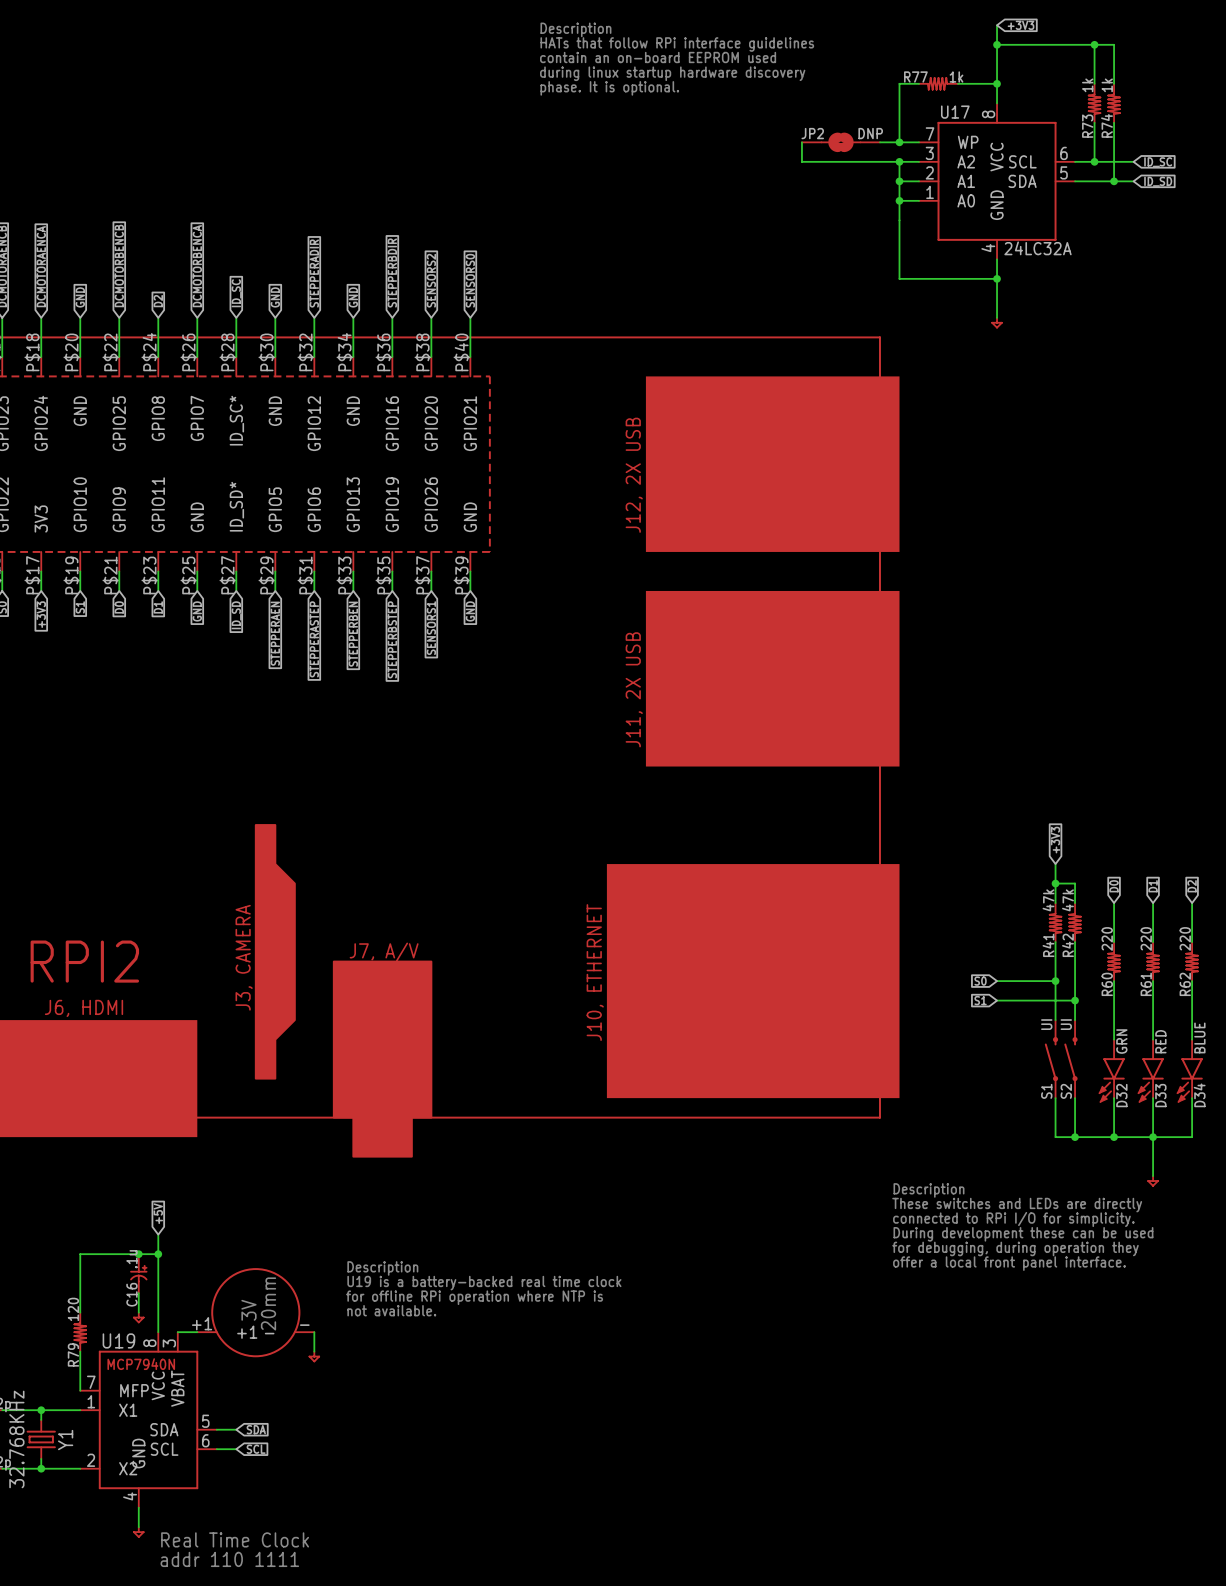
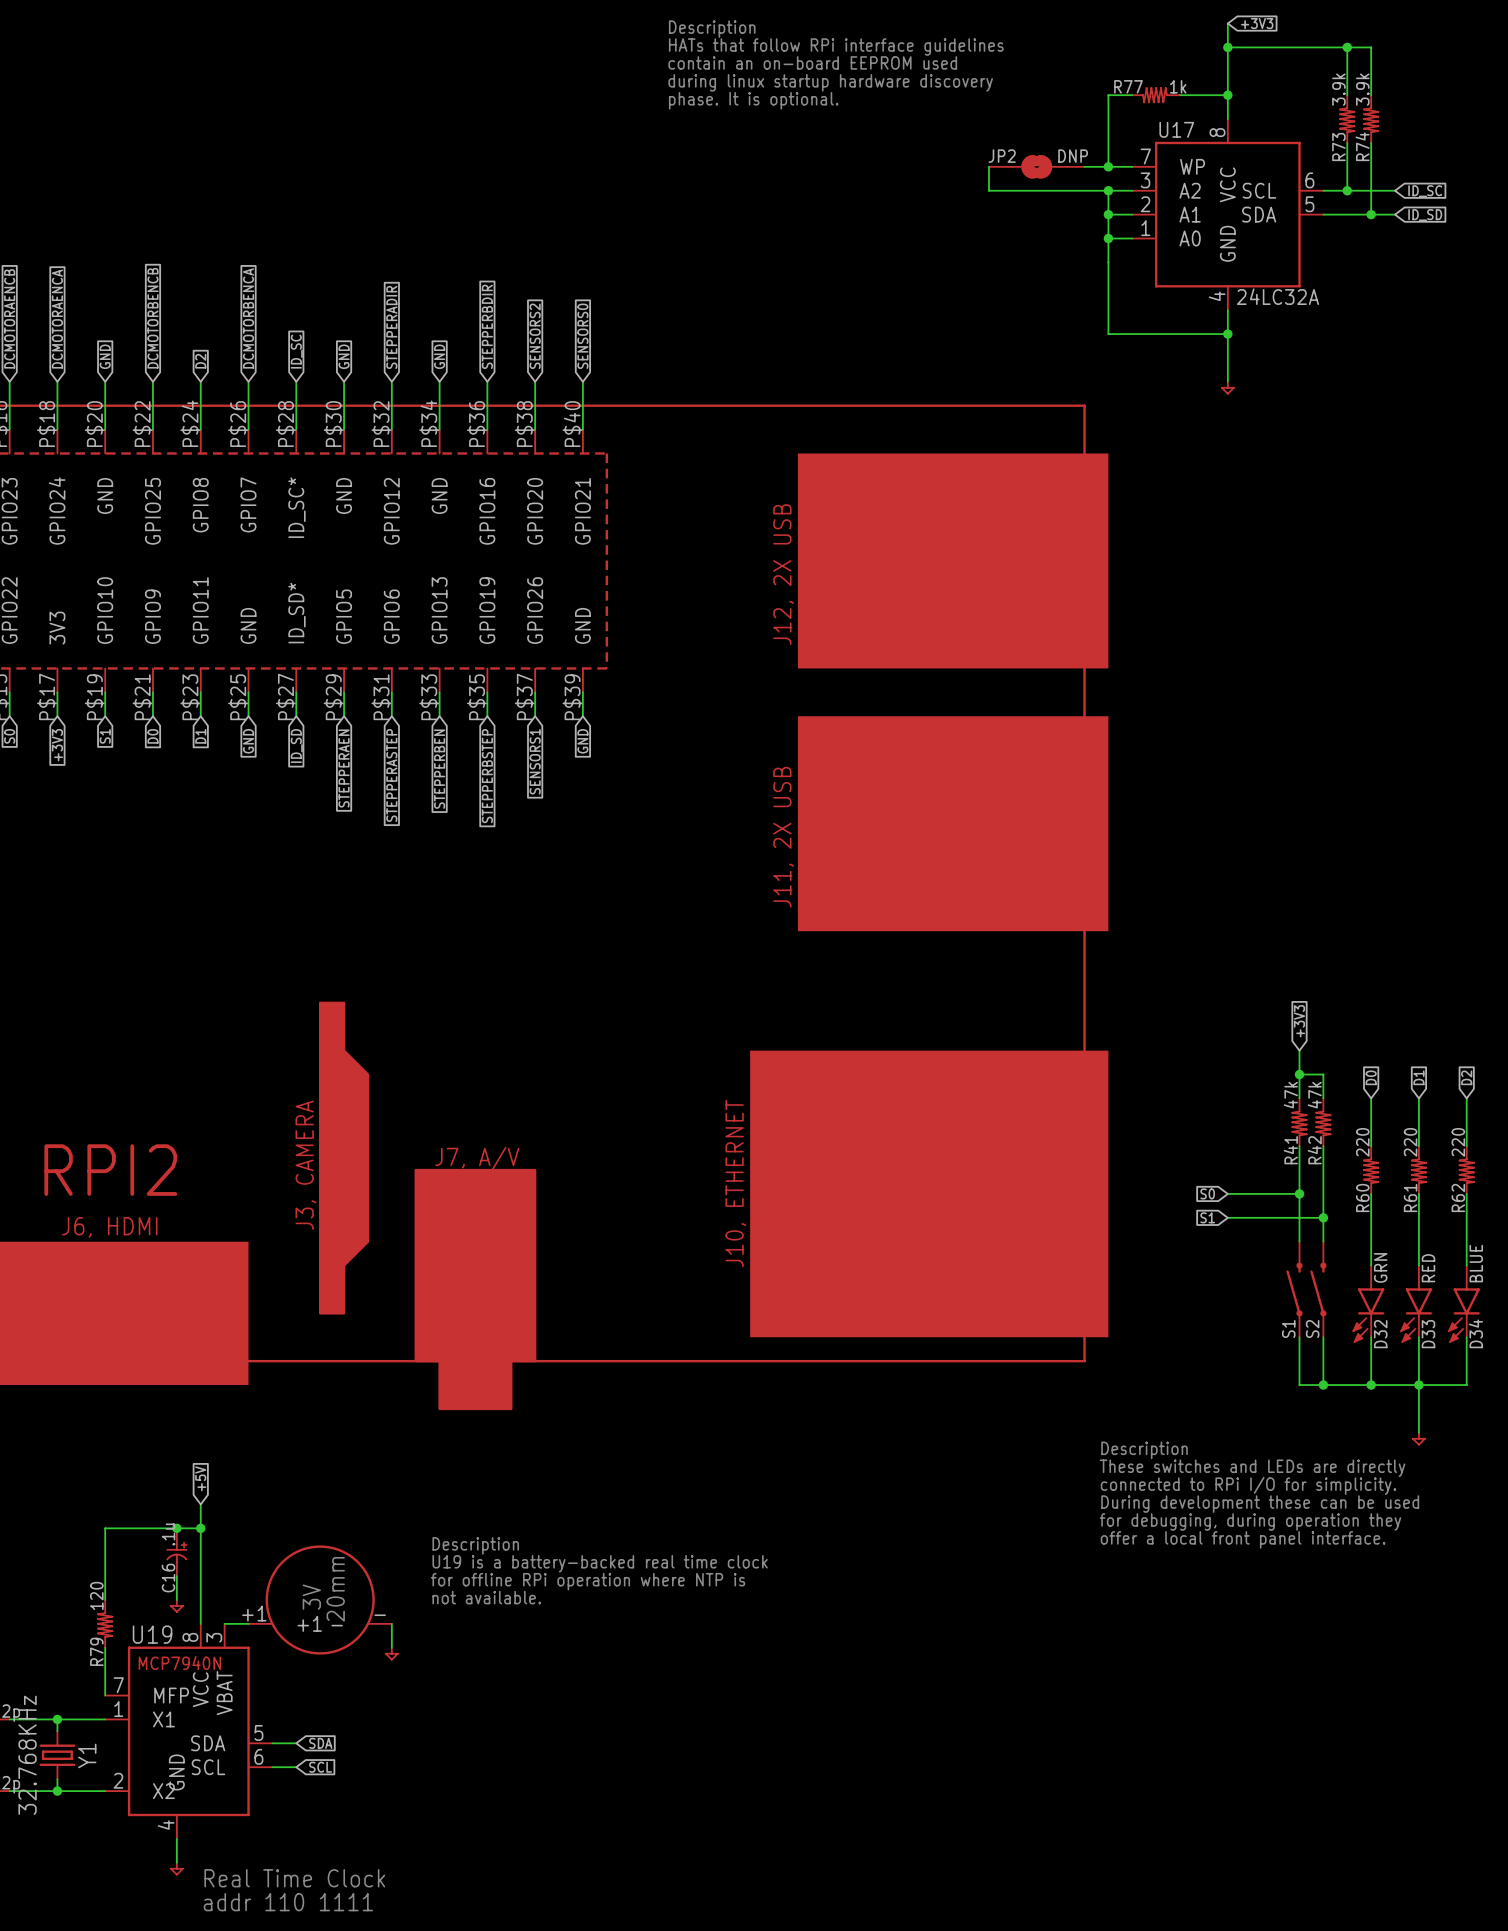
R73 value: 1k (1087, 85) -> 3.9k (1338, 89)
R74 value: 1k (1107, 85) -> 3.9k (1362, 89)
S1 value: UI (1046, 1024) -> none
S2 value: UI (1066, 1024) -> none

